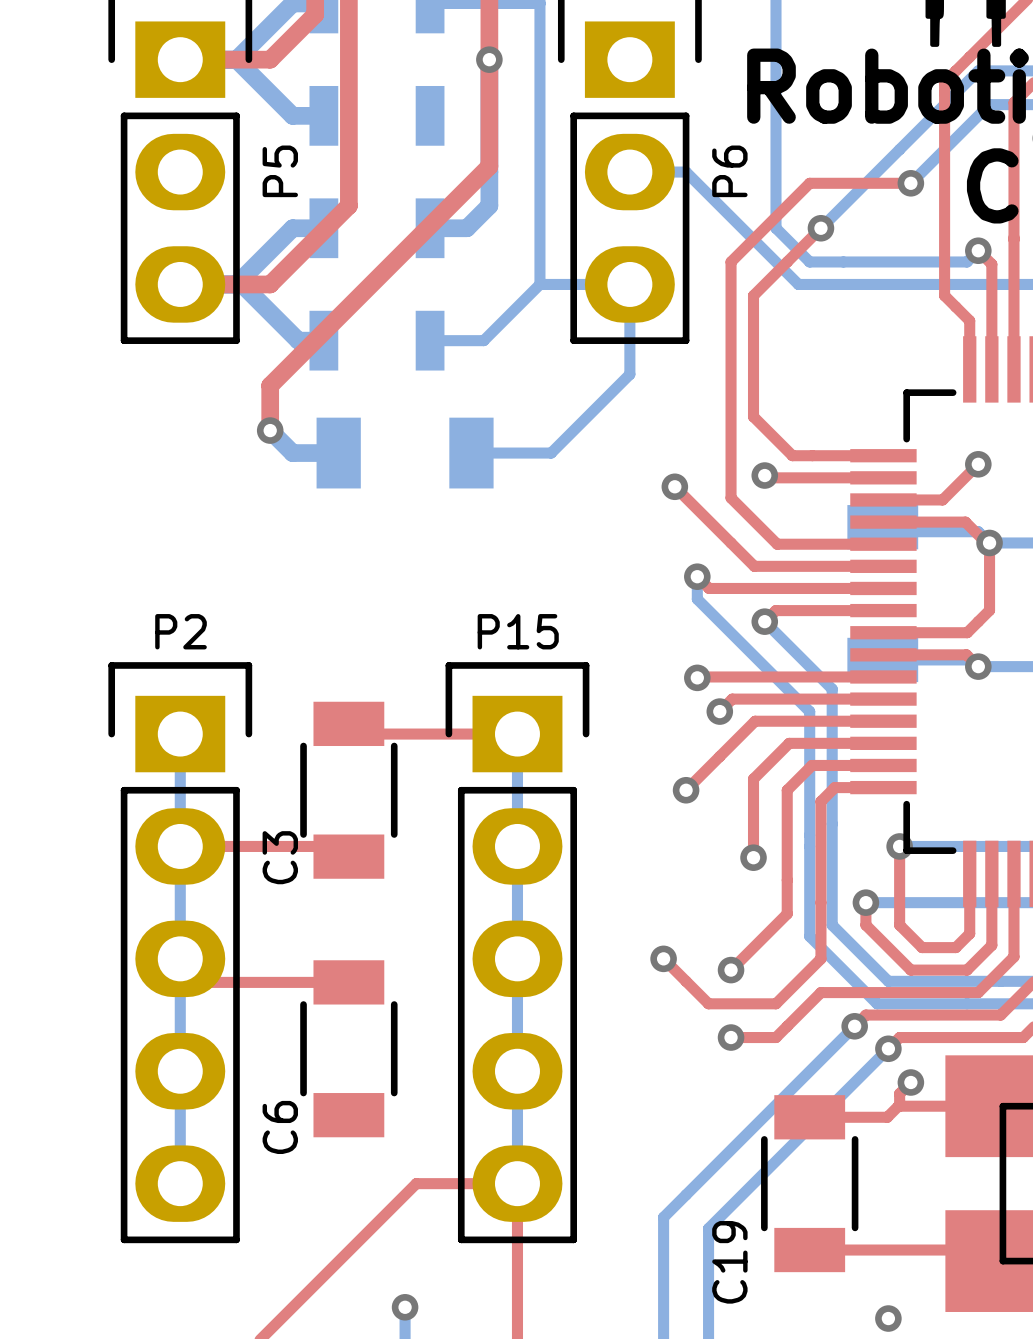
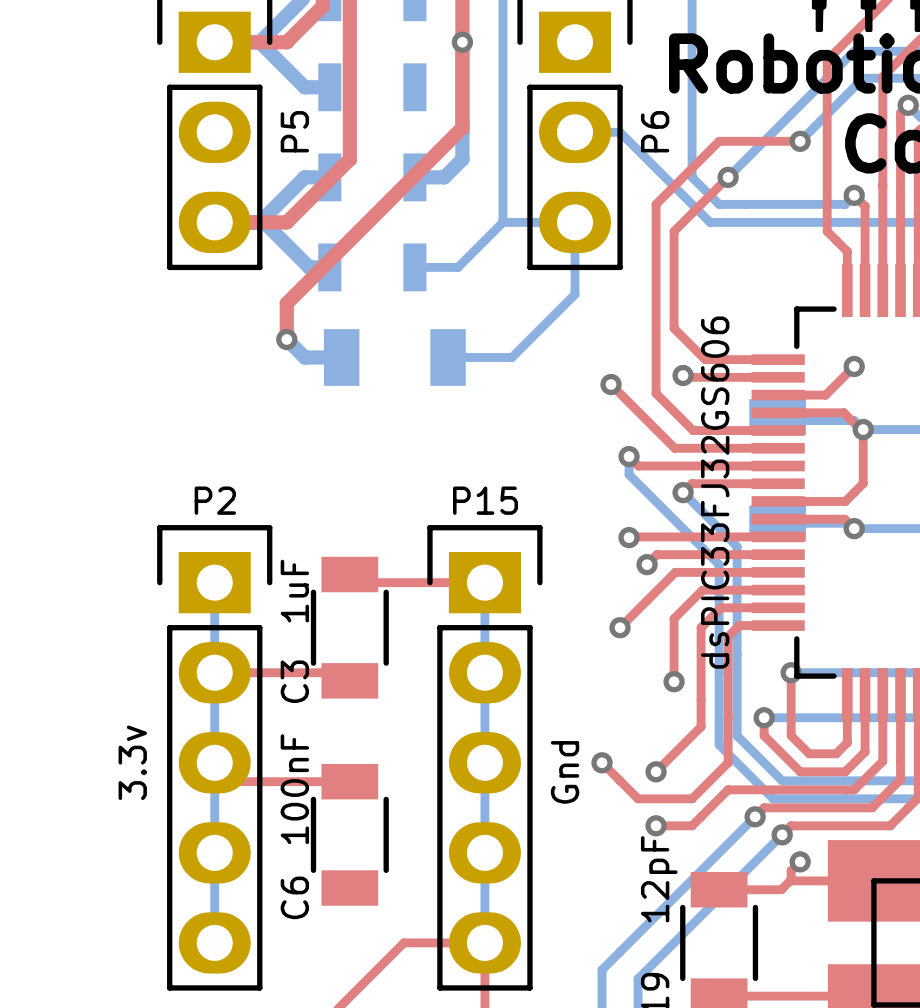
part value: none -> dsPIC33FJ32GS606 (715, 492)
C3 value: none -> 1uF (294, 591)
P2 value: none -> 3.3v (132, 762)
P15 value: none -> Gnd (565, 772)
C6 value: none -> 100nF (294, 789)
C19 value: none -> 12pF (659, 879)

